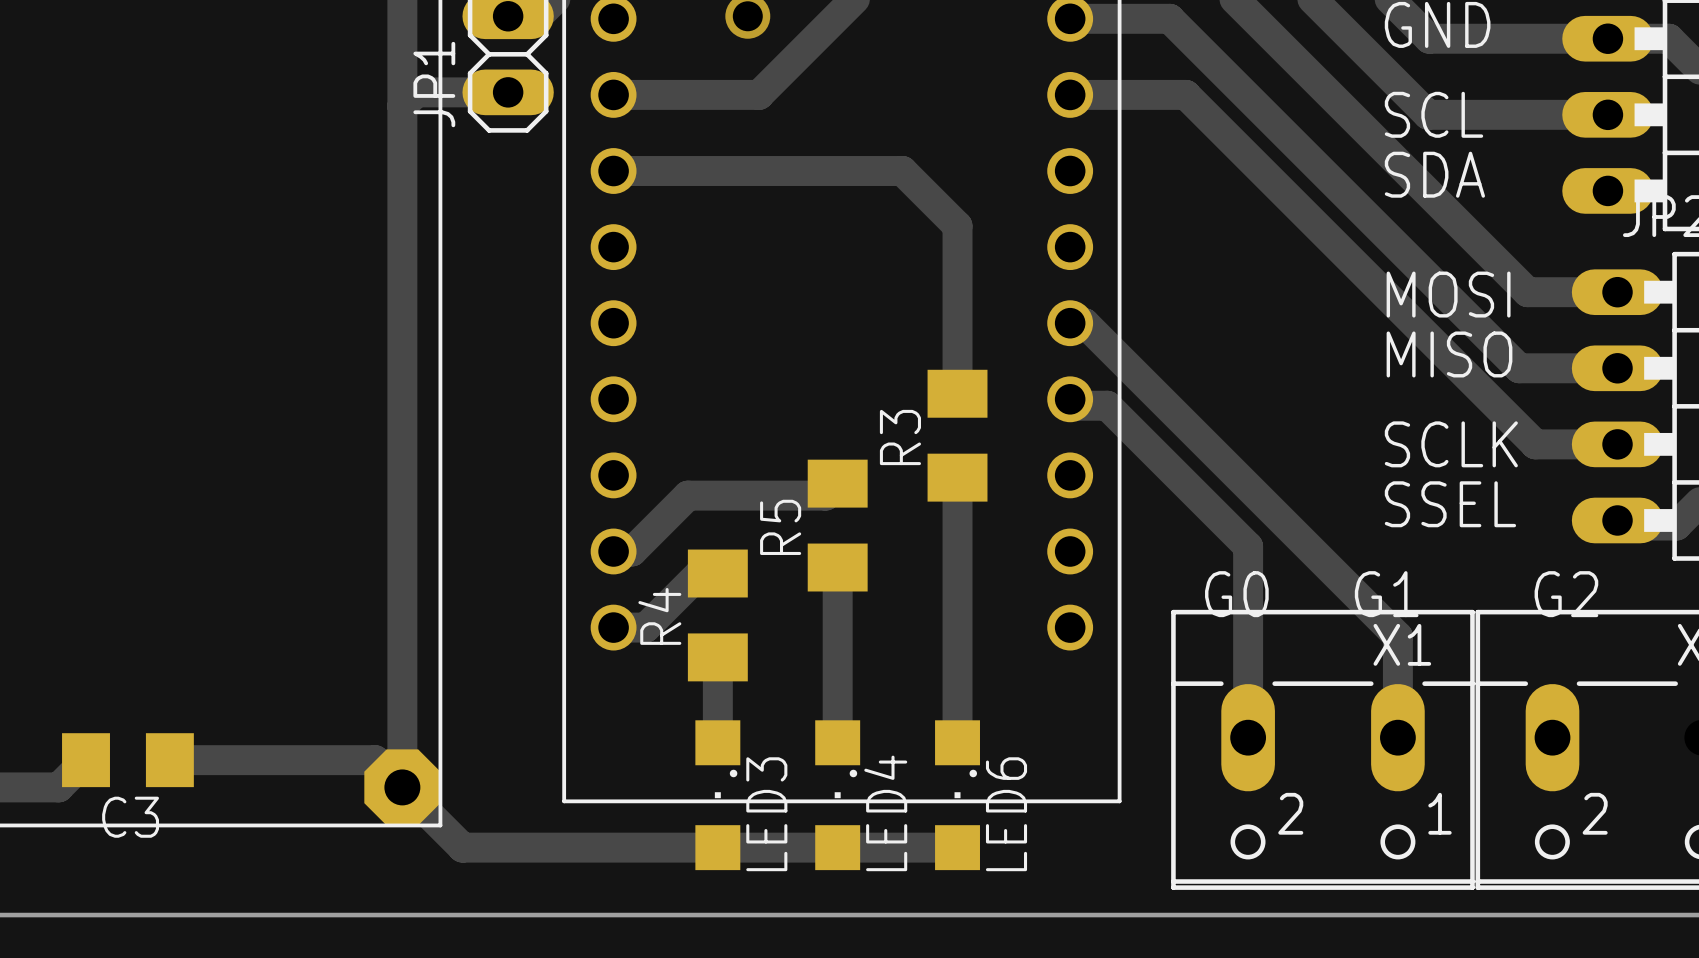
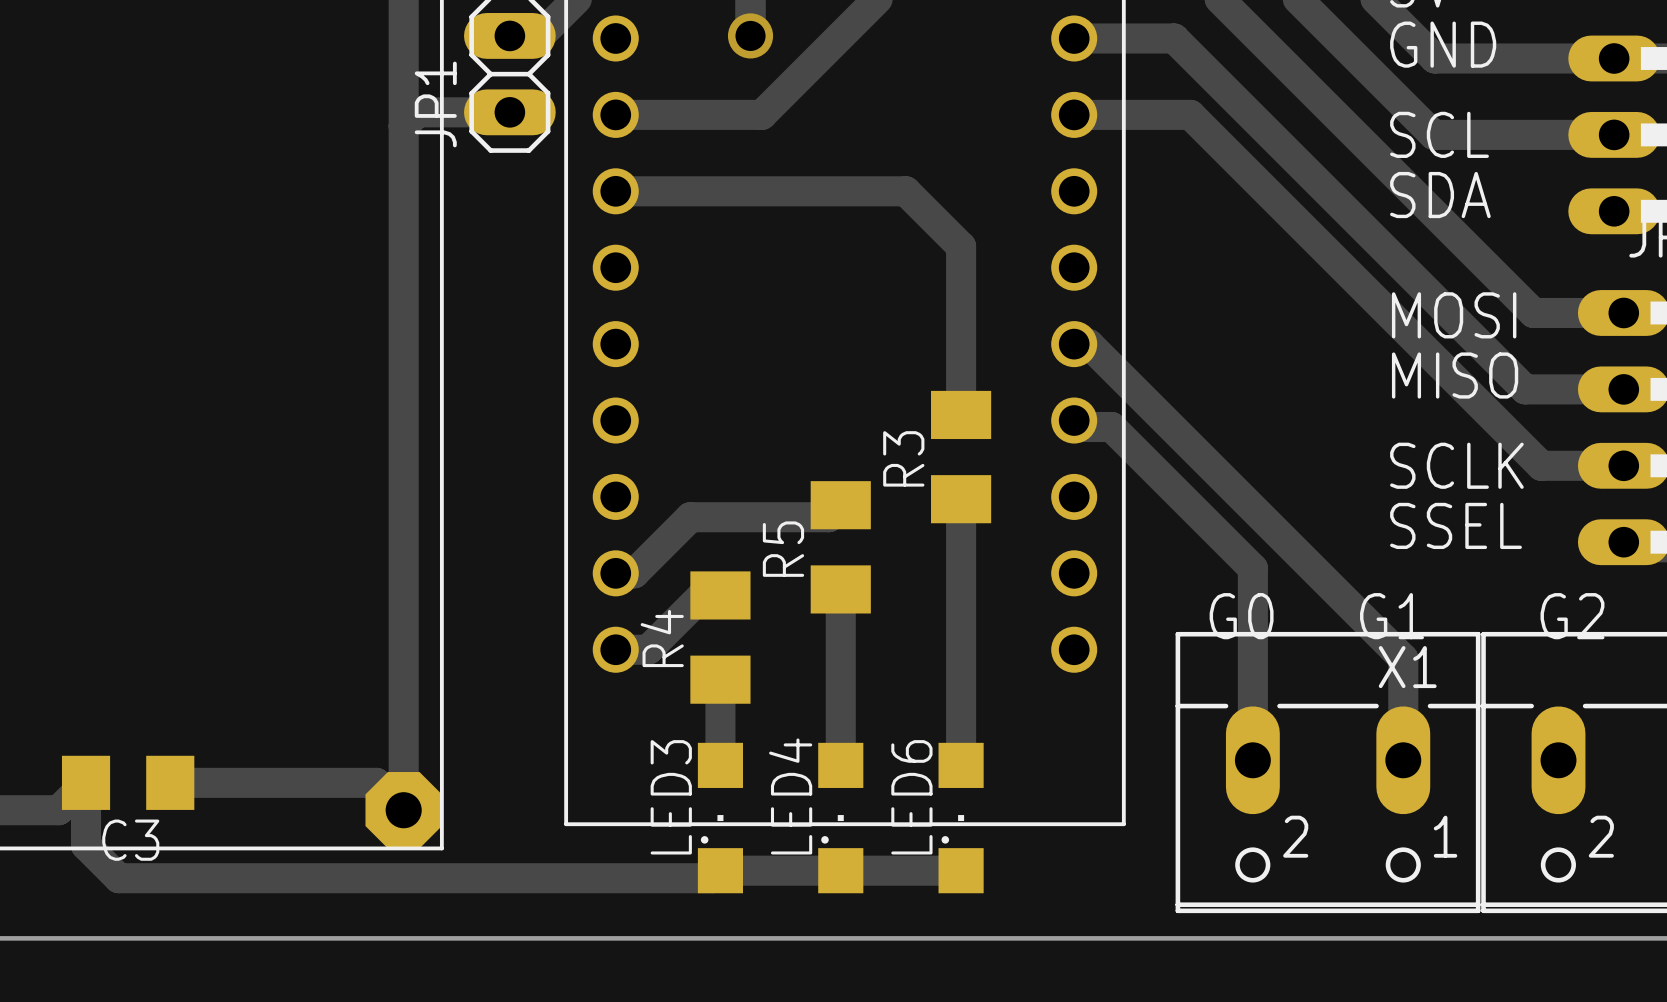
track: (402, 787) (462, 847) (717, 847) -> (86, 782) (86, 845) (118, 878) (712, 878) (720, 870)
LED3 rotation: 0° (717, 795) -> 180° (720, 818)
LED4 rotation: 0° (837, 795) -> 180° (840, 818)
LED6 rotation: 0° (957, 795) -> 180° (961, 818)

